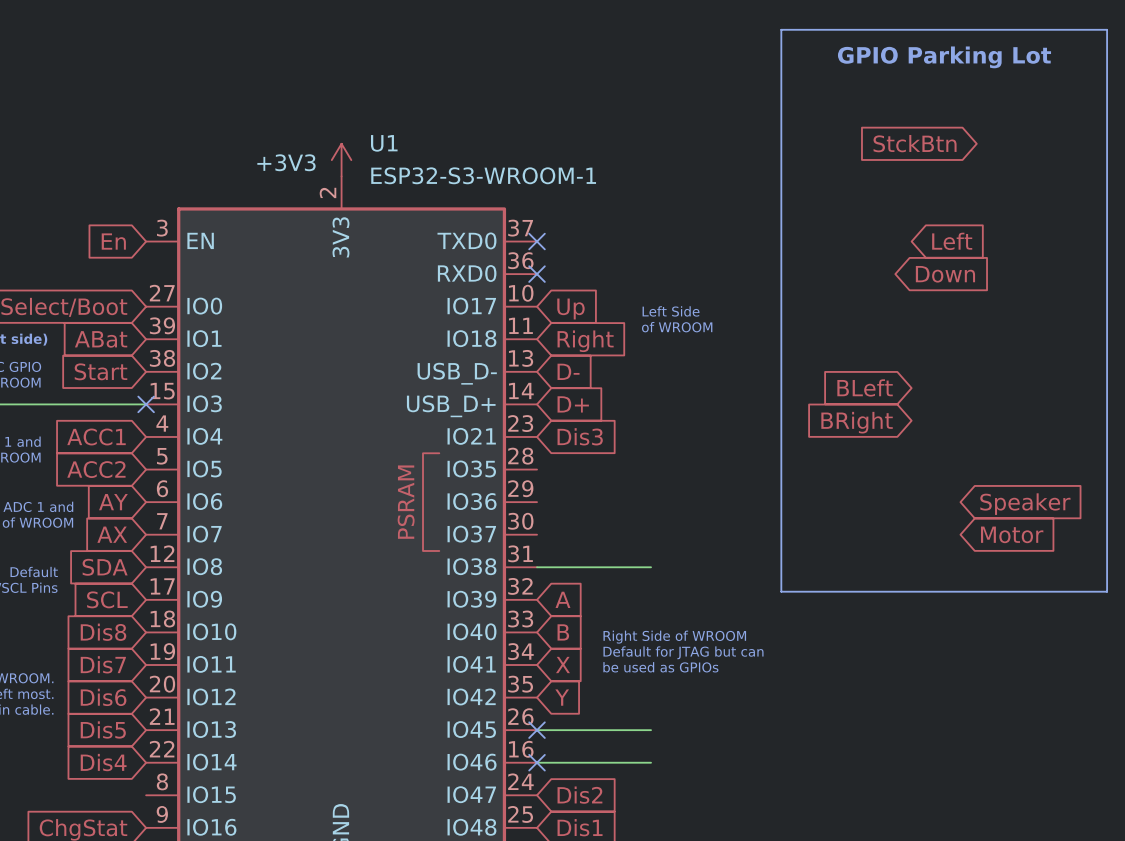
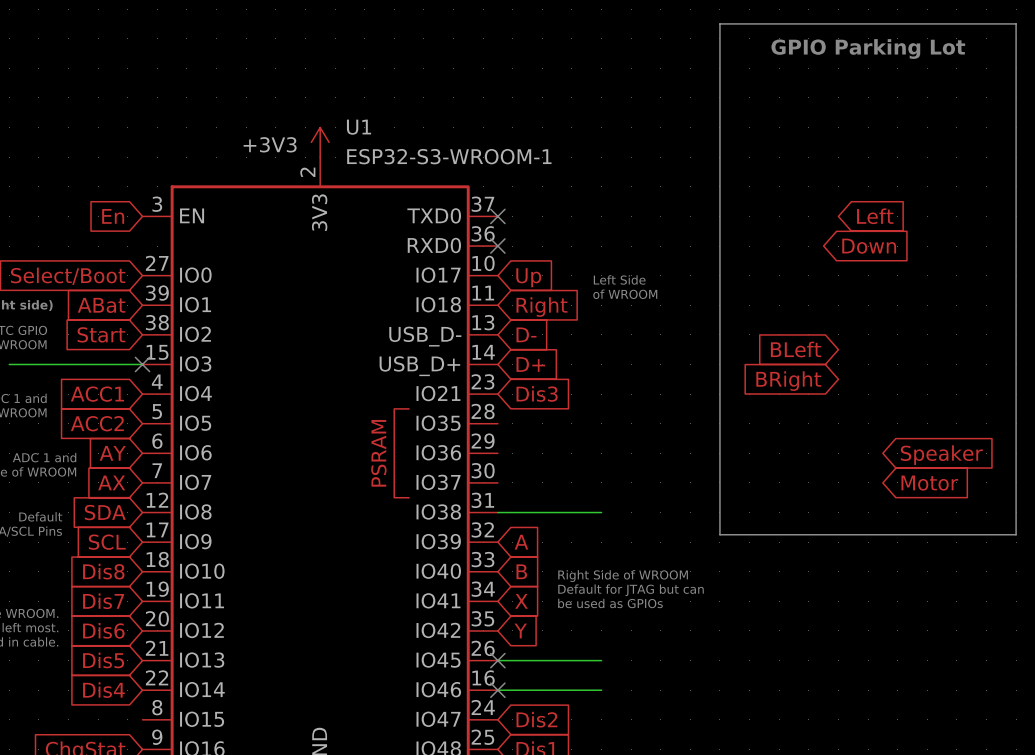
global label: StckBtn (915, 143) -> none

